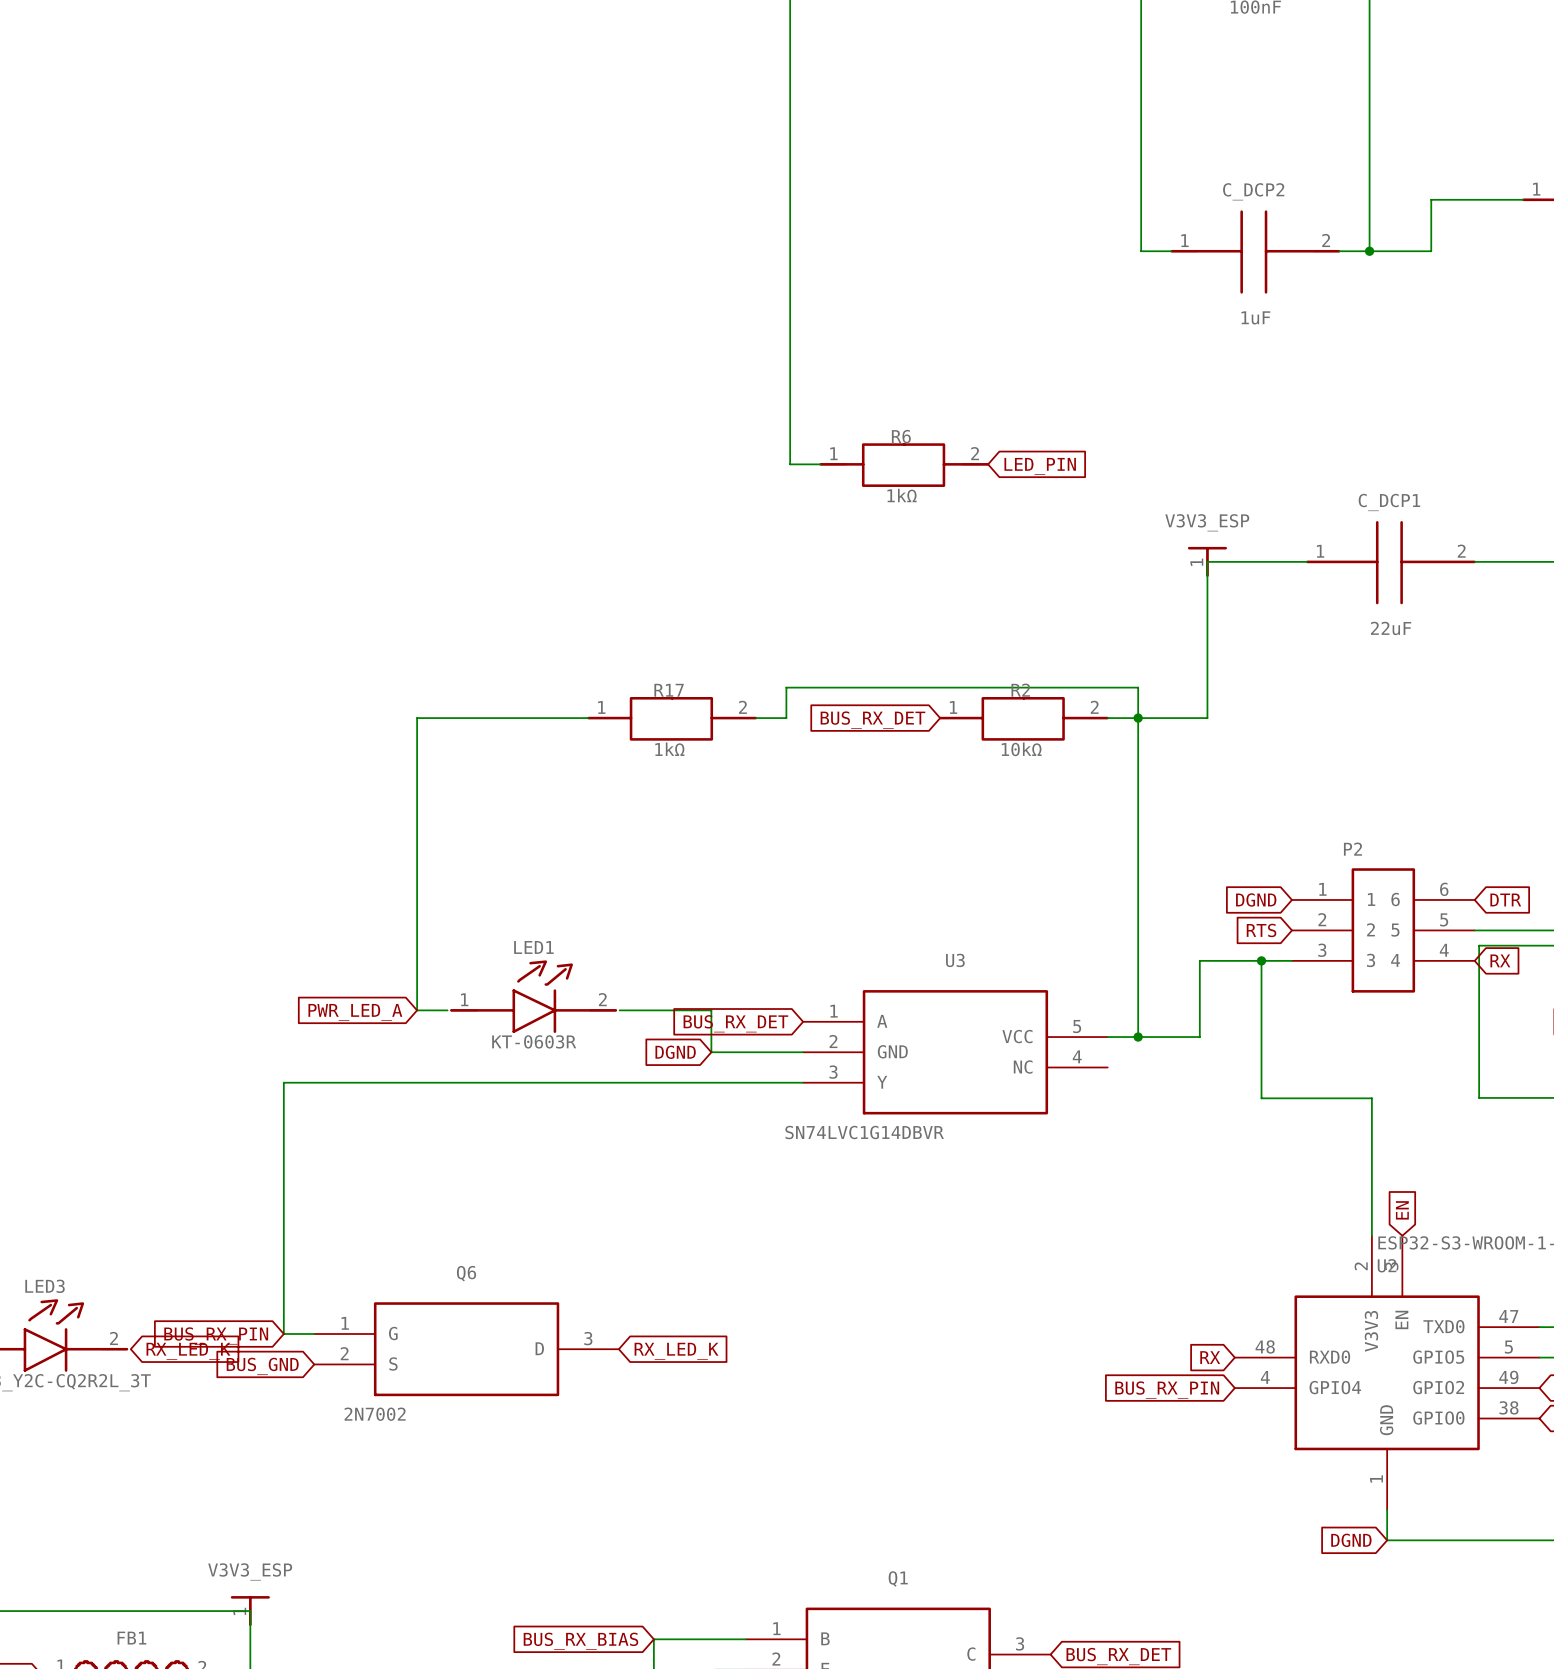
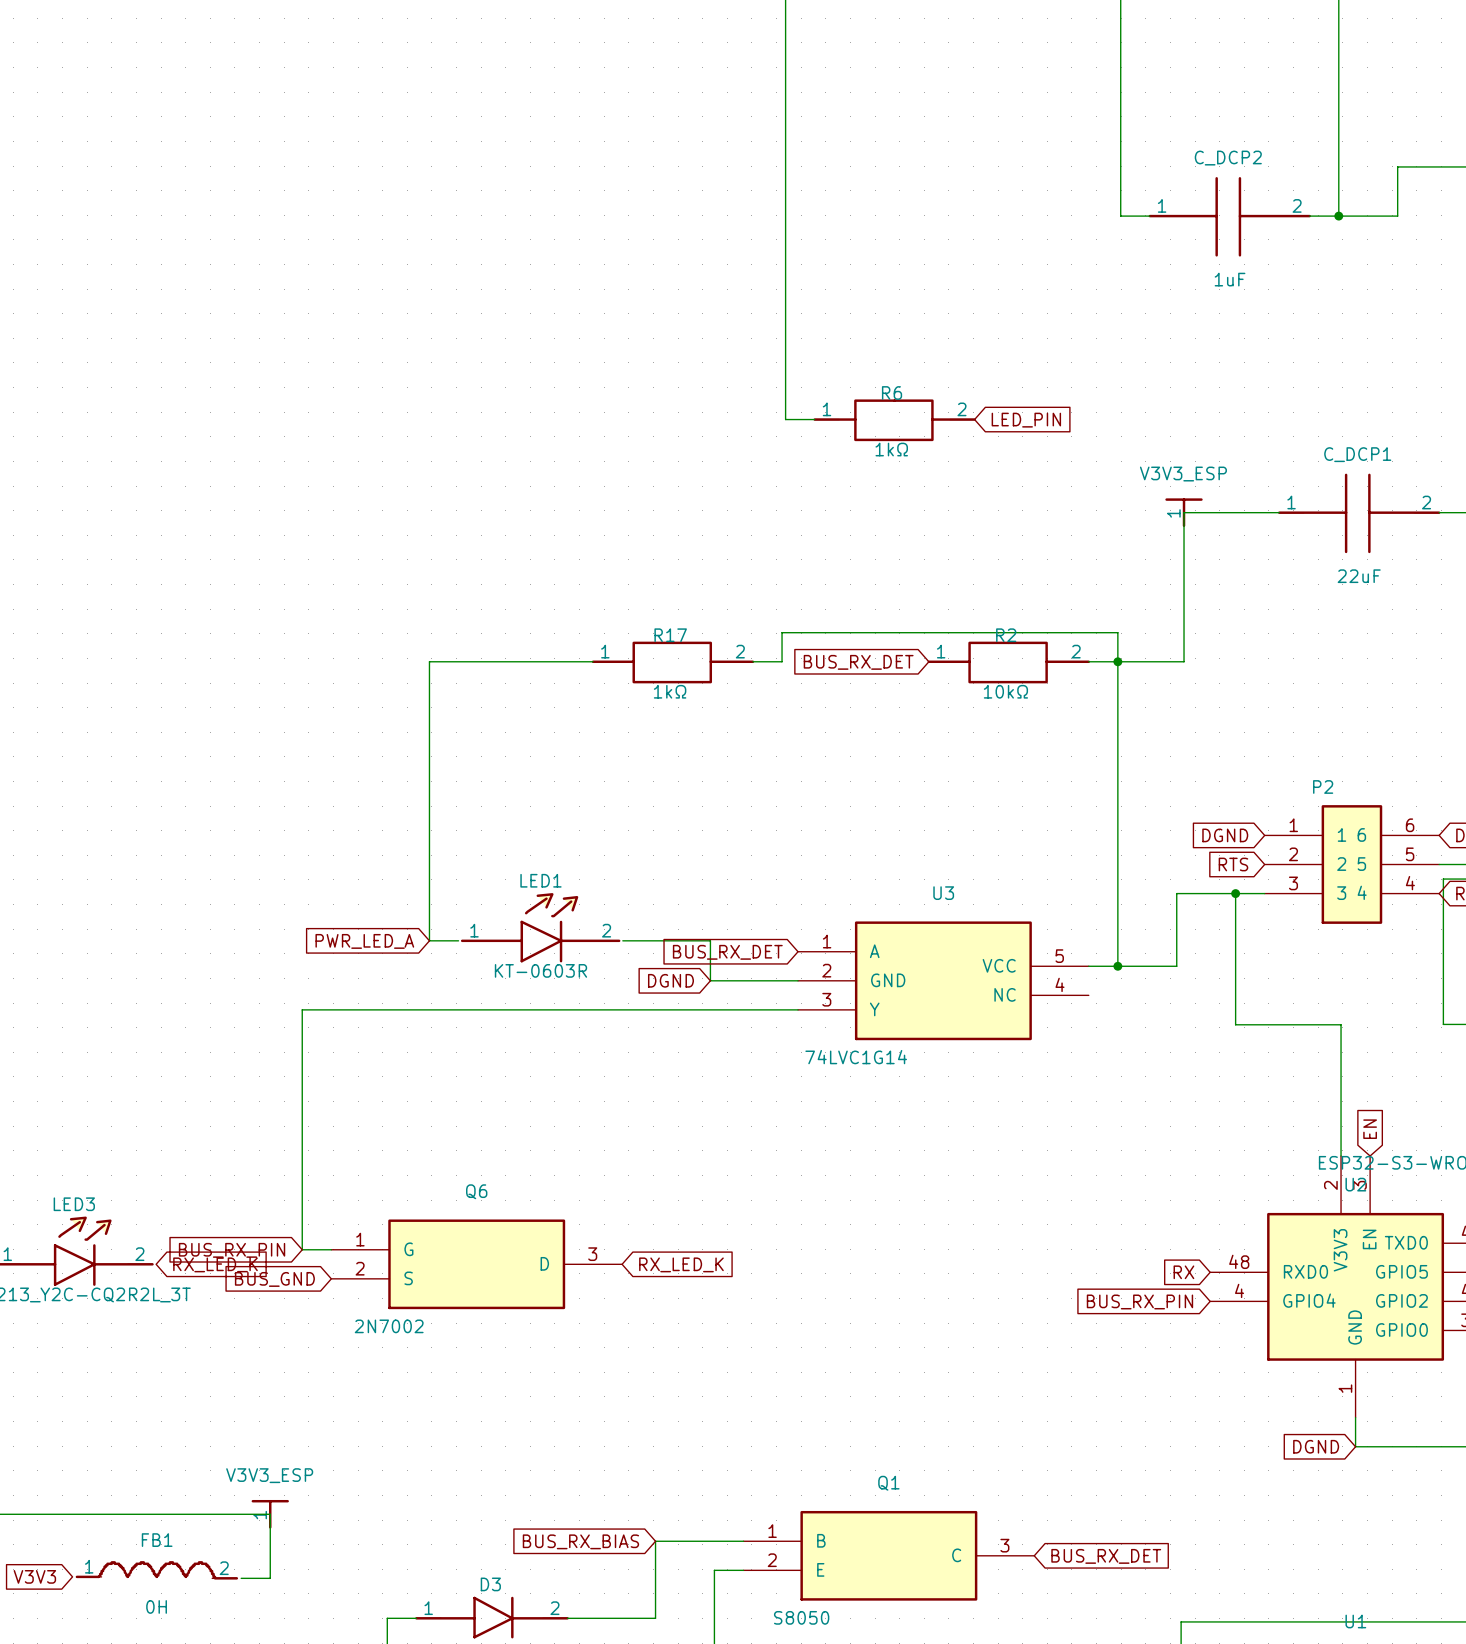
U3 value: SN74LVC1G14DBVR (864, 1132) -> 74LVC1G14 (856, 1057)

